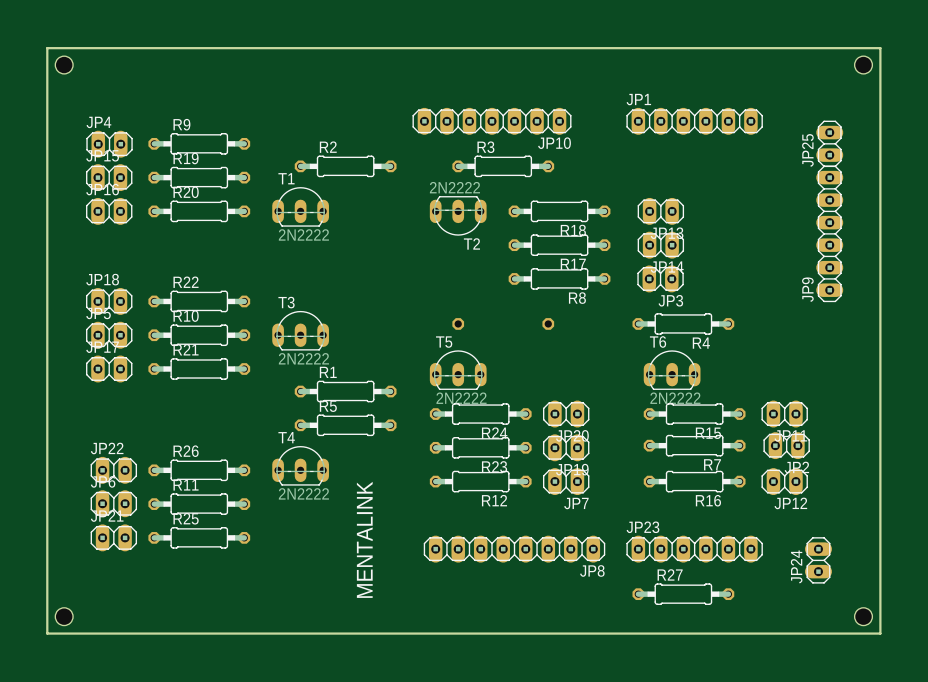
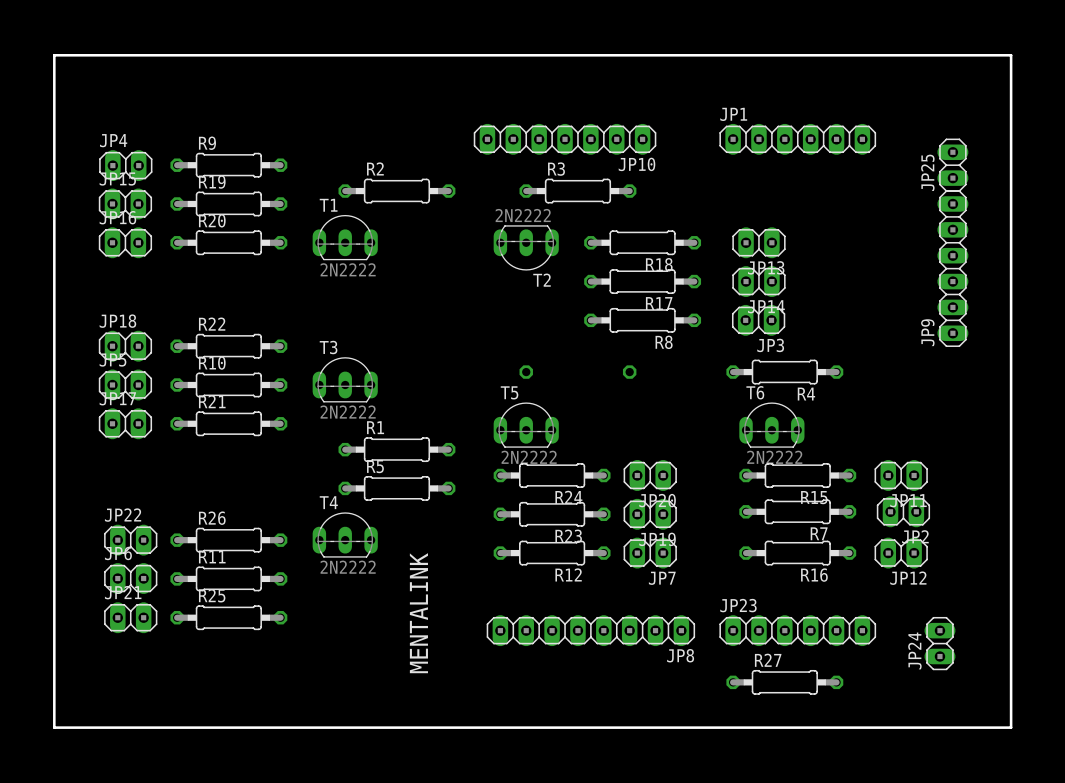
hole: (64, 65) -> none
hole: (863, 65) -> none
hole: (64, 616) -> none
hole: (863, 616) -> none

